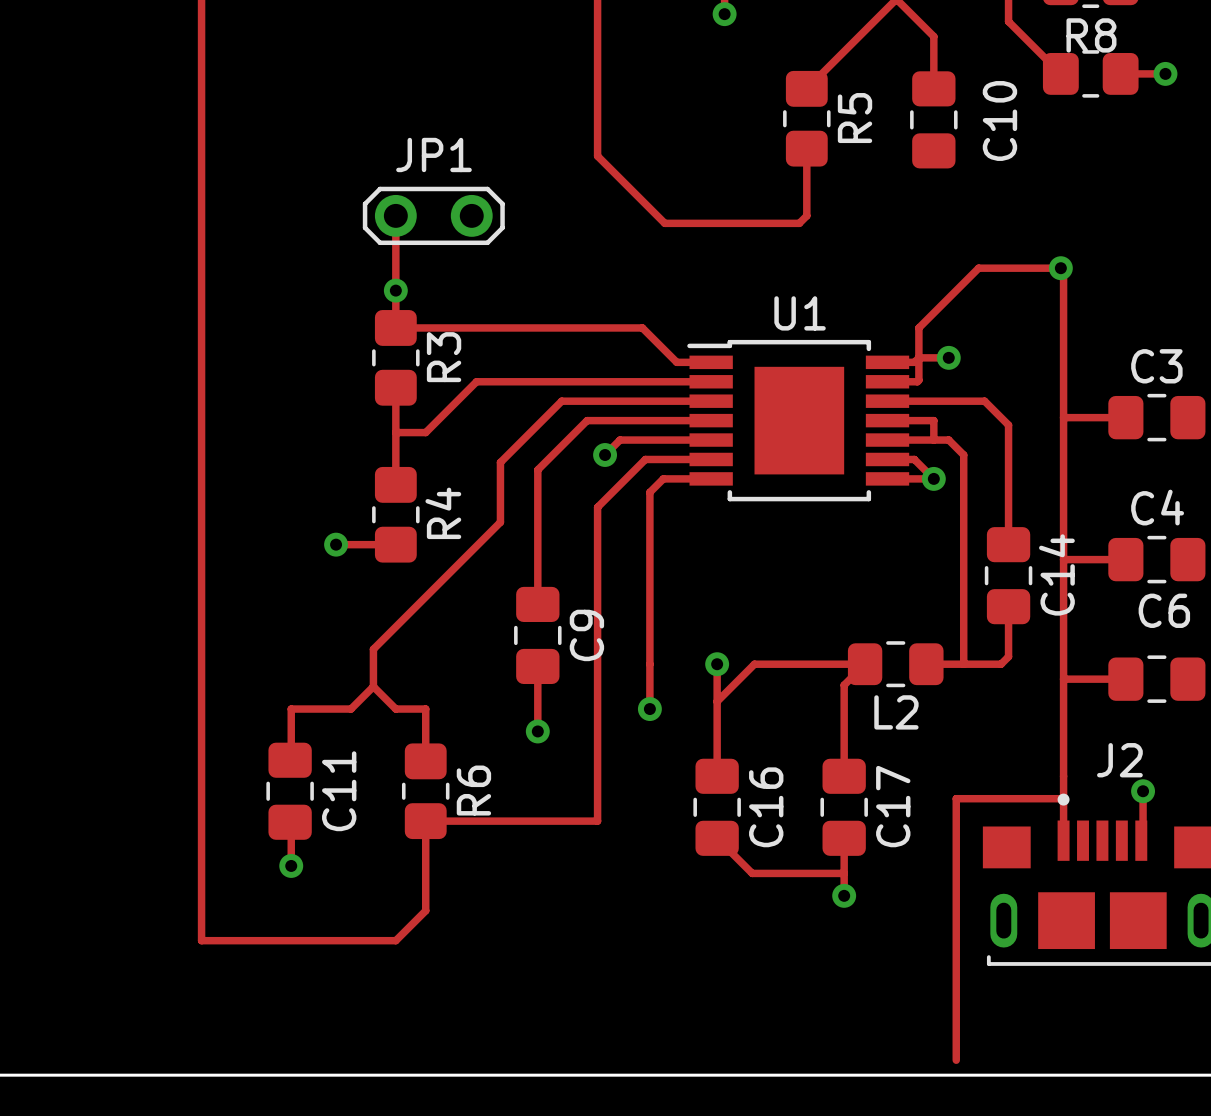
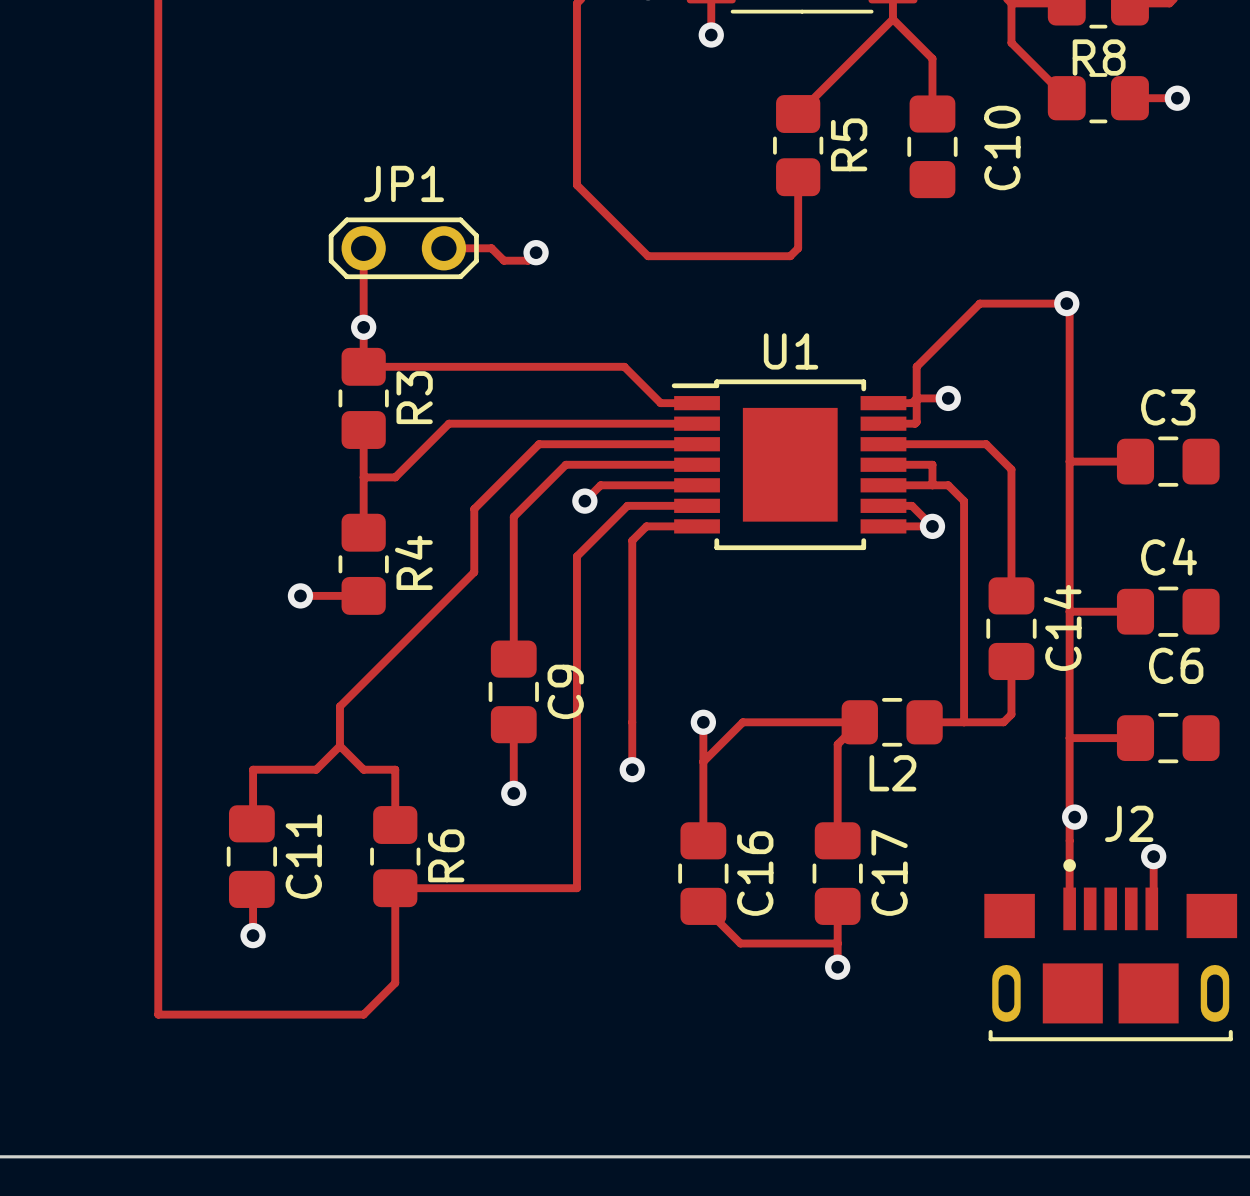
top track: none -> (443, 248) (491, 248) (503, 260) (528, 260) (536, 252)
via: none -> (536, 252)
via: none -> (1074, 817)
top track: (1063, 798) (956, 798) (956, 1060) -> none

